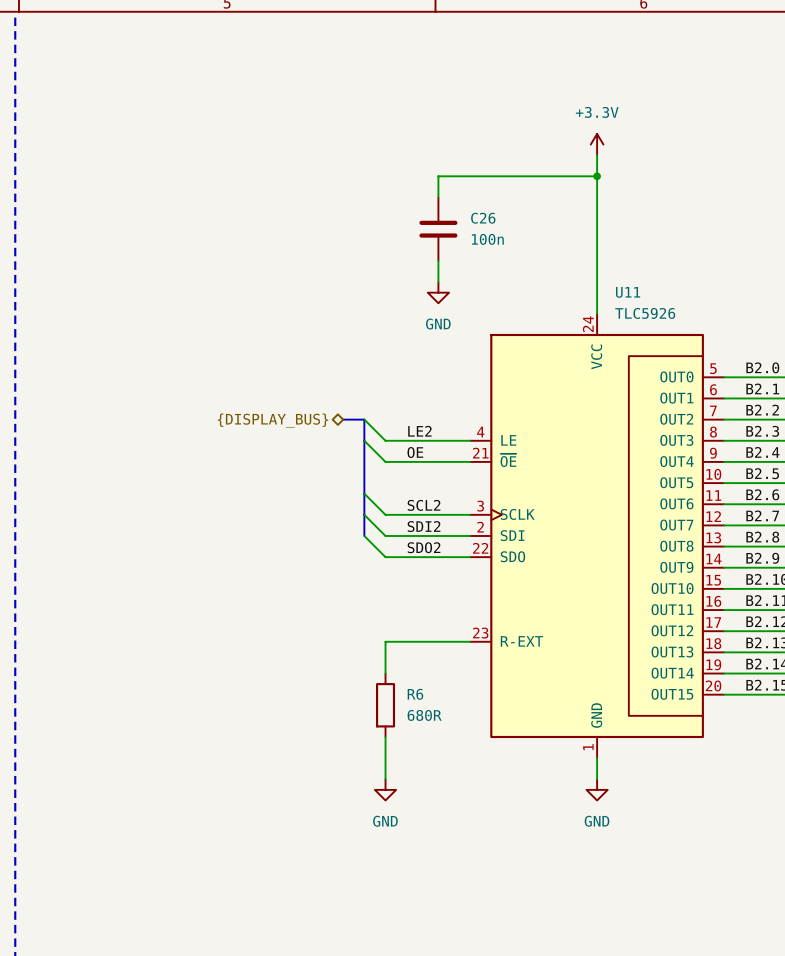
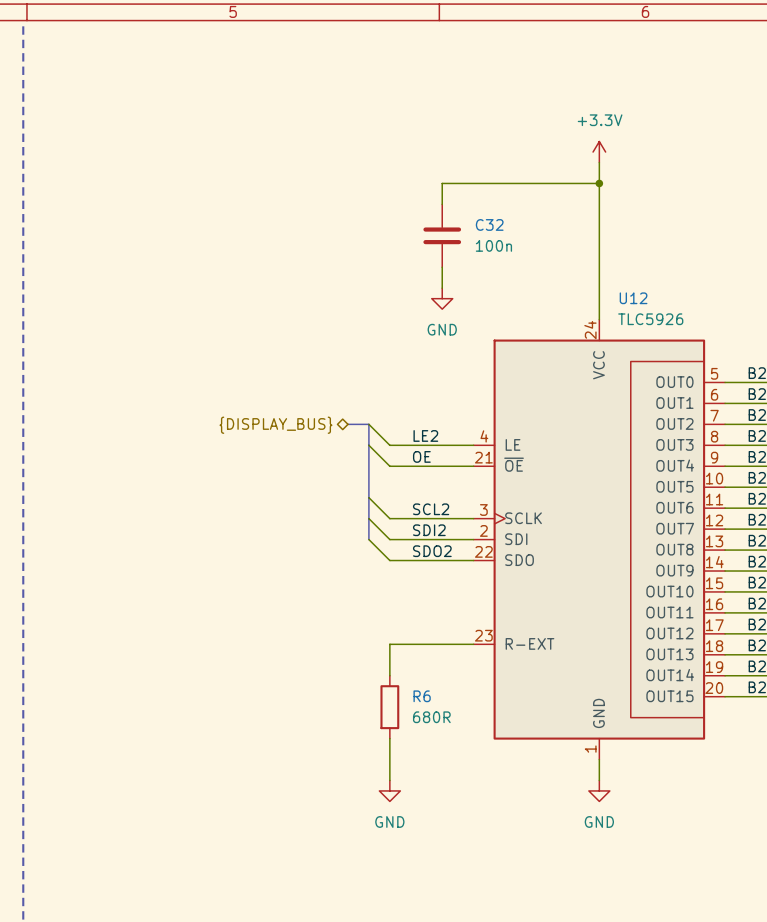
C26 name: C26 (483, 218) -> C32 (489, 224)
U11 name: U11 (628, 292) -> U12 (633, 298)

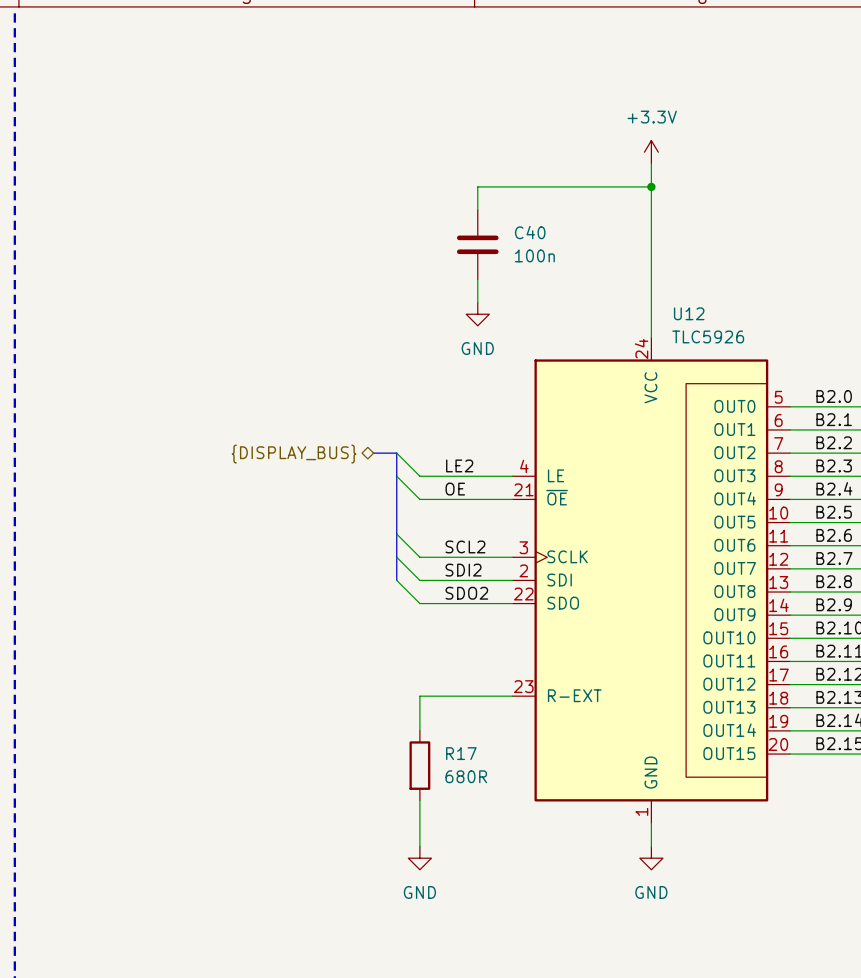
C32 name: C32 (489, 224) -> C40 (530, 232)
R6 name: R6 (422, 696) -> R17 (461, 753)

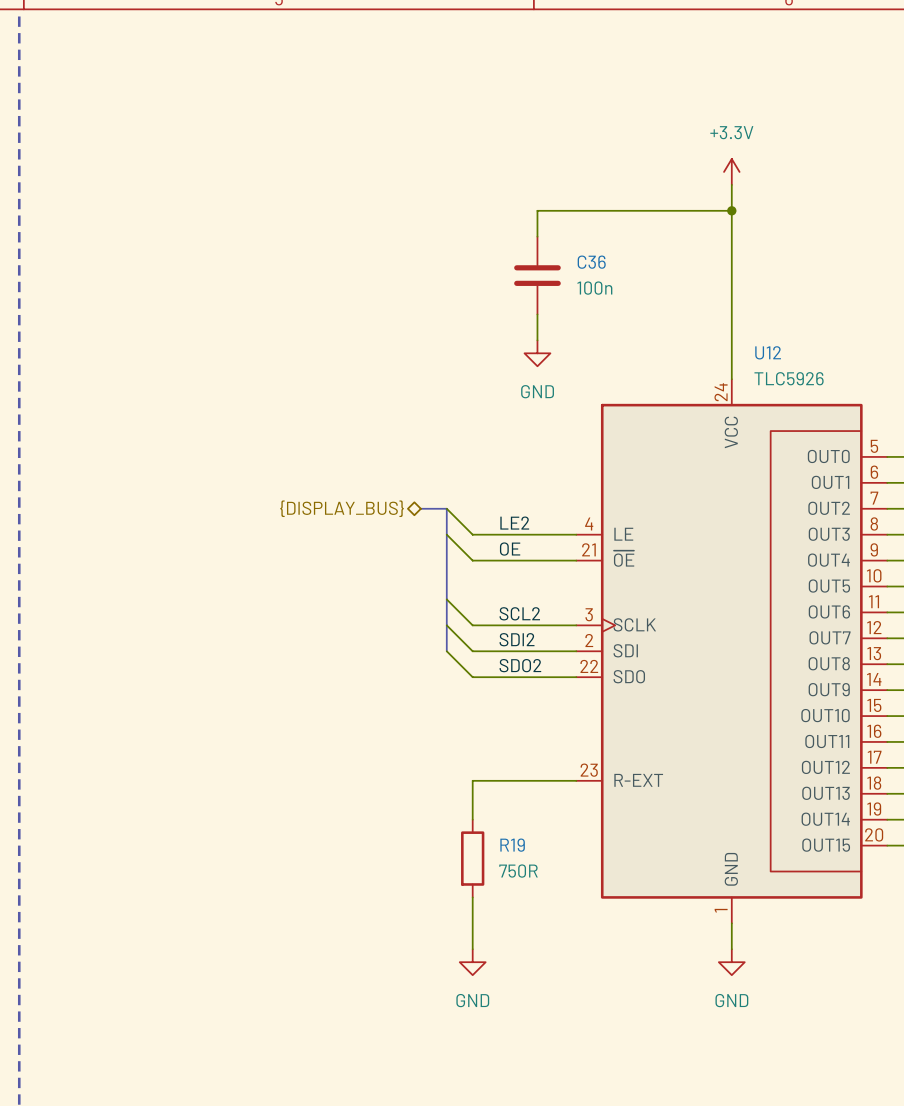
C40 name: C40 (530, 232) -> C36 (591, 262)
R17 name: R17 (461, 753) -> R19 (512, 845)
R17 value: 680R (466, 776) -> 750R (518, 871)

